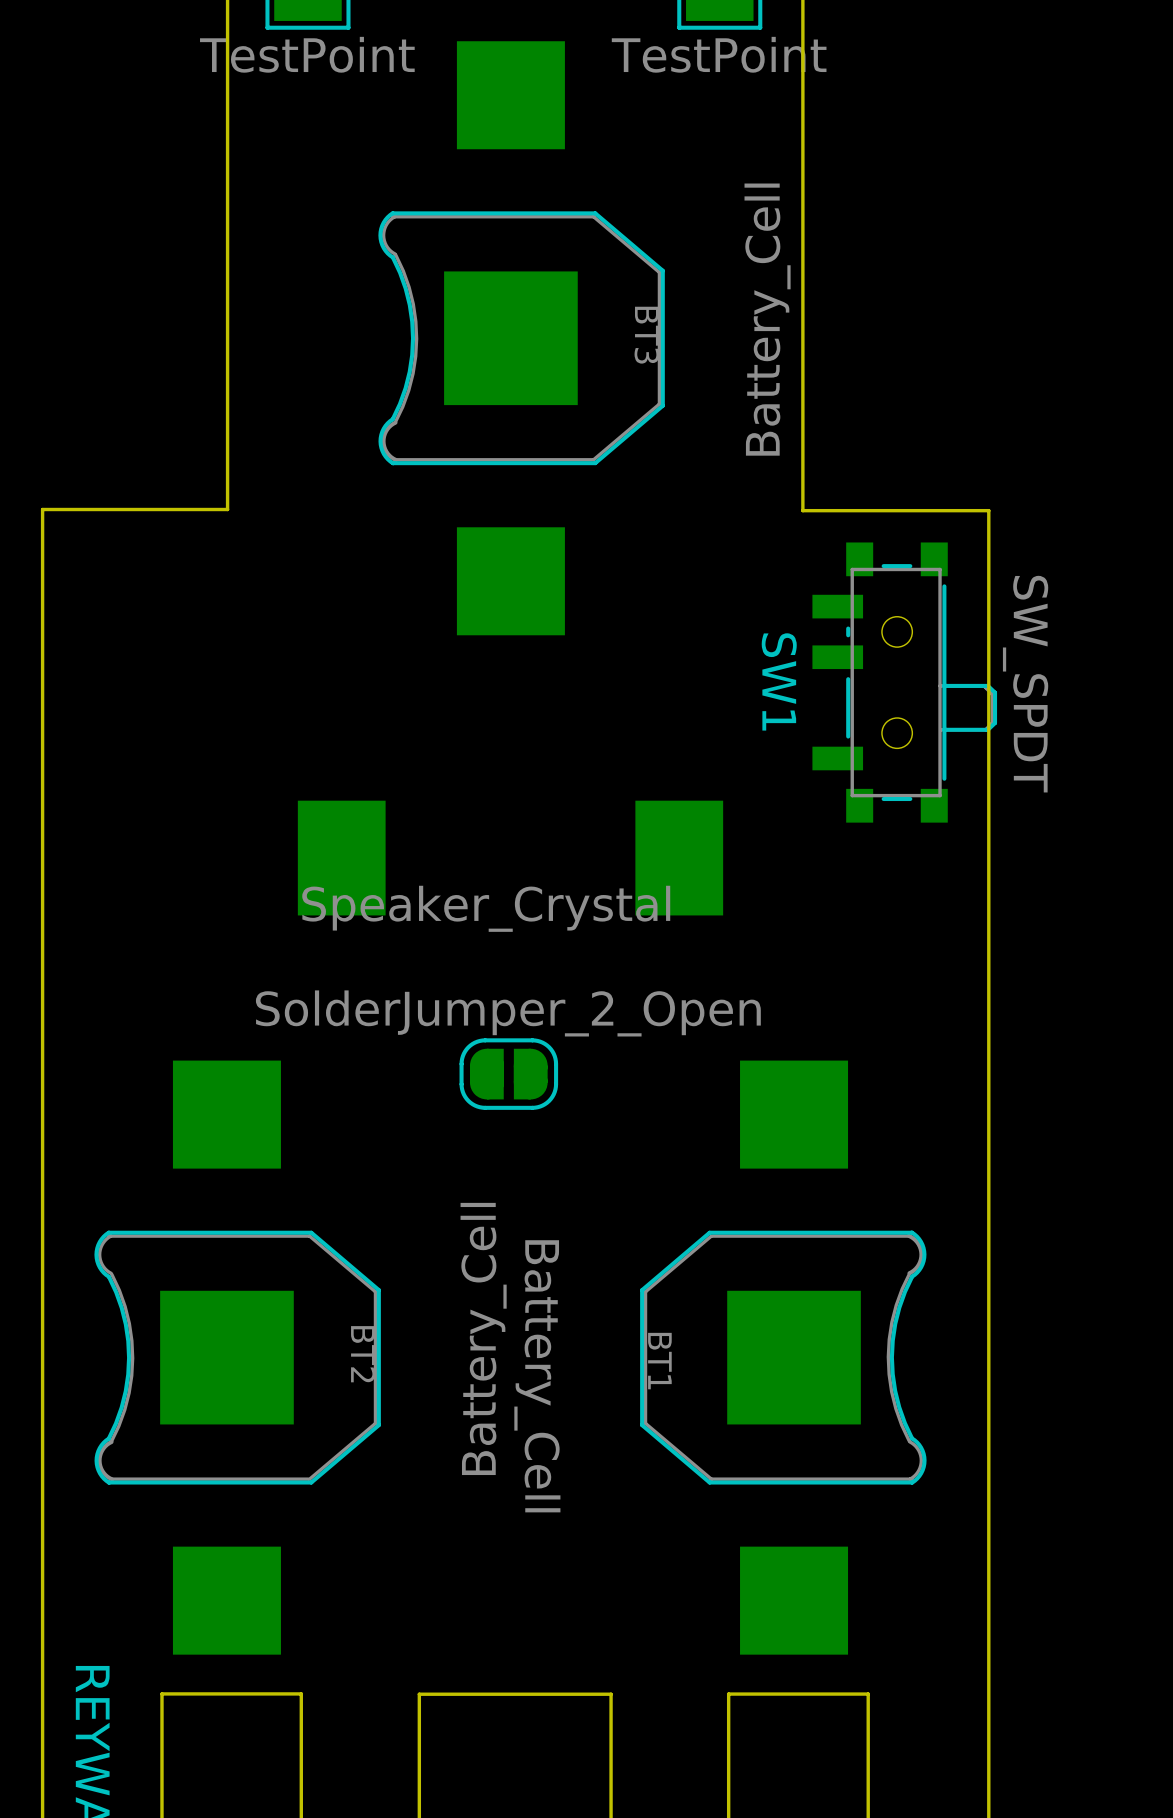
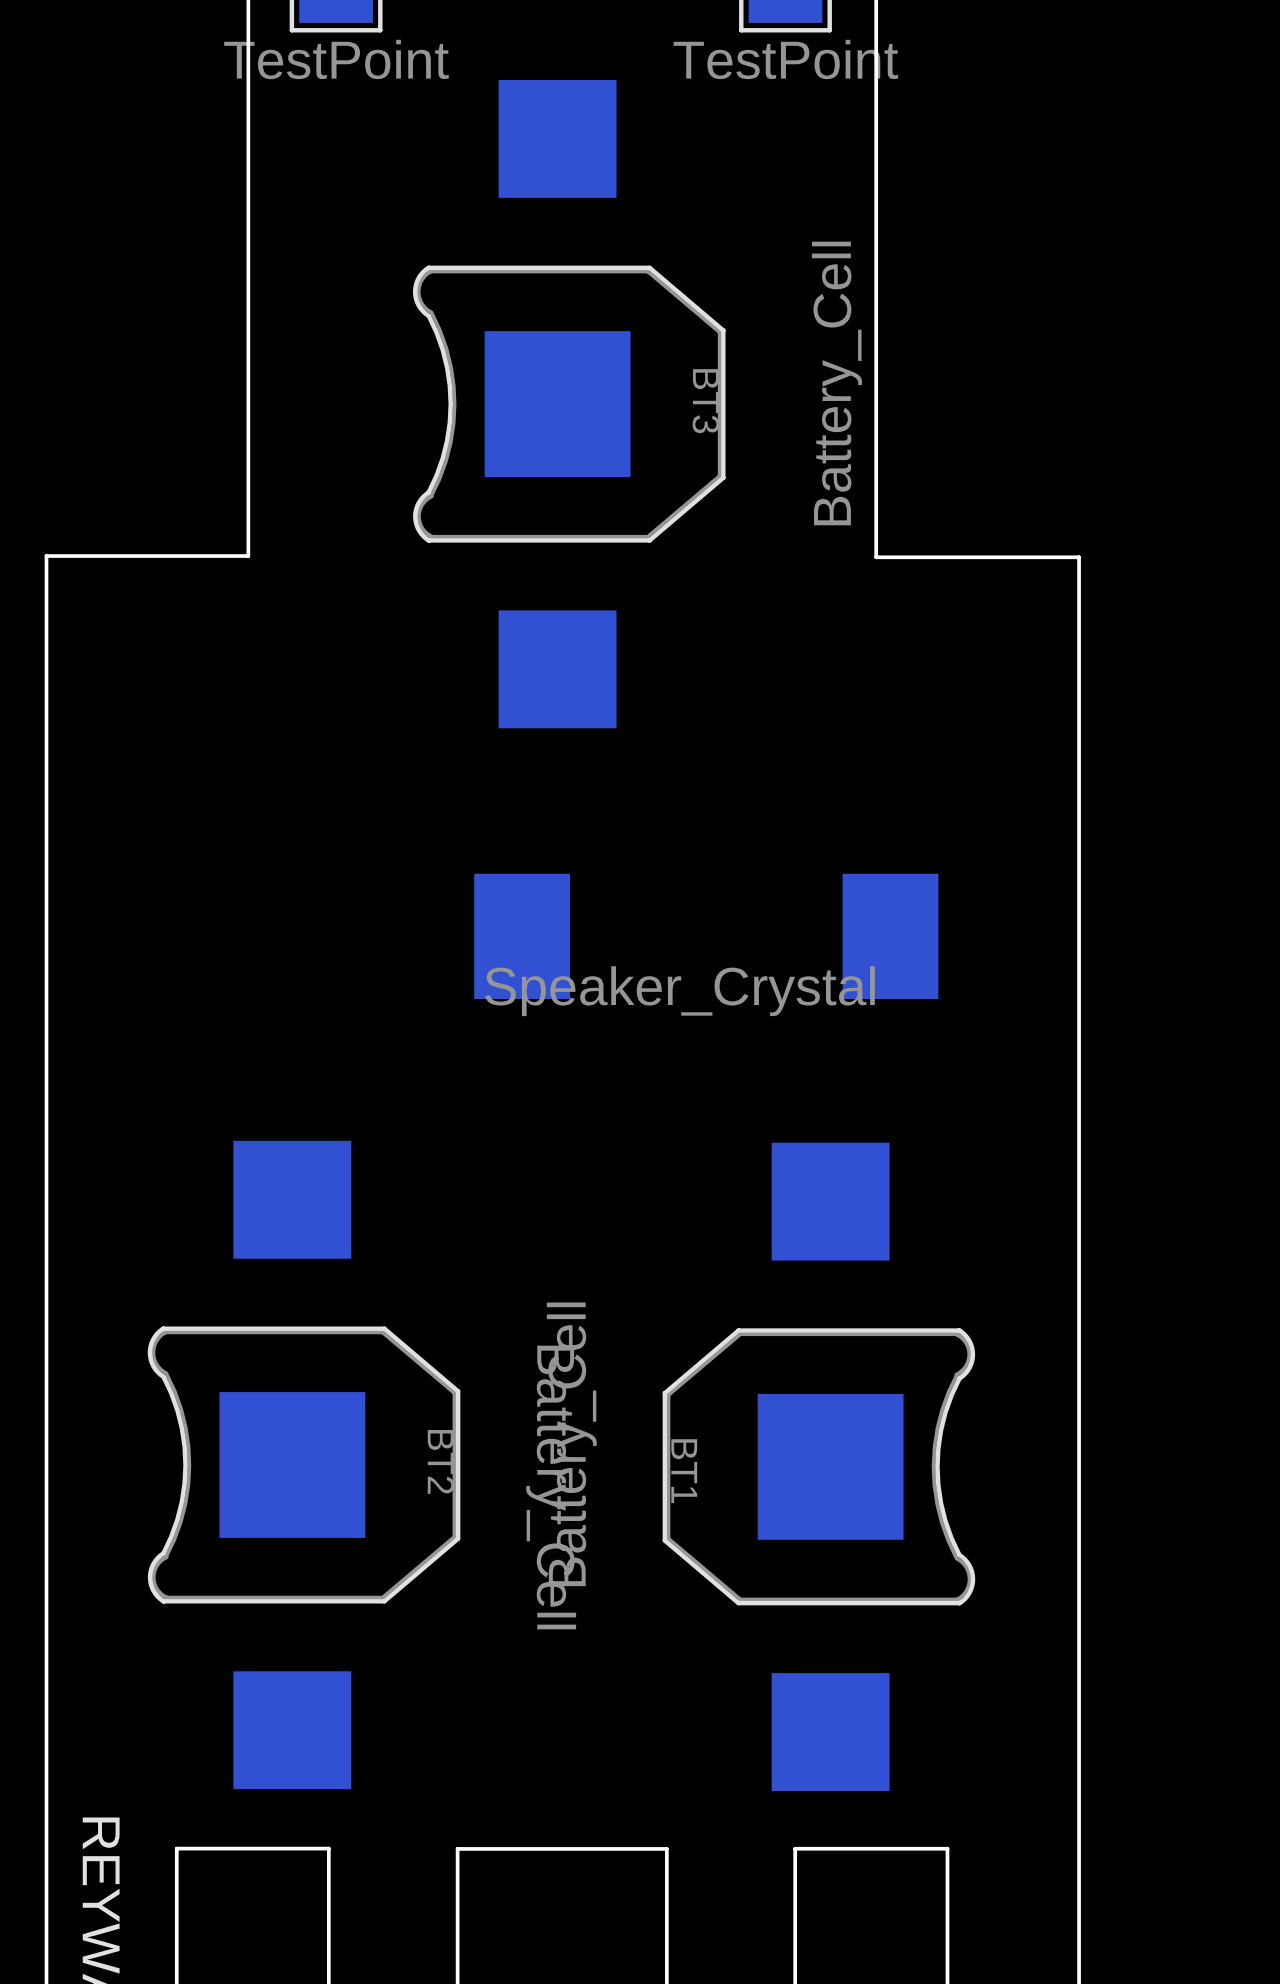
BT3 position: (521, 338) -> (569, 404)
SW1: SW_SPDT (904, 682) -> none
part position: (510, 858) -> (706, 936)
part: SolderJumper_2_Open (508, 1074) -> none
BT2 position: (237, 1357) -> (304, 1465)
BT1 position: (783, 1357) -> (818, 1466)

